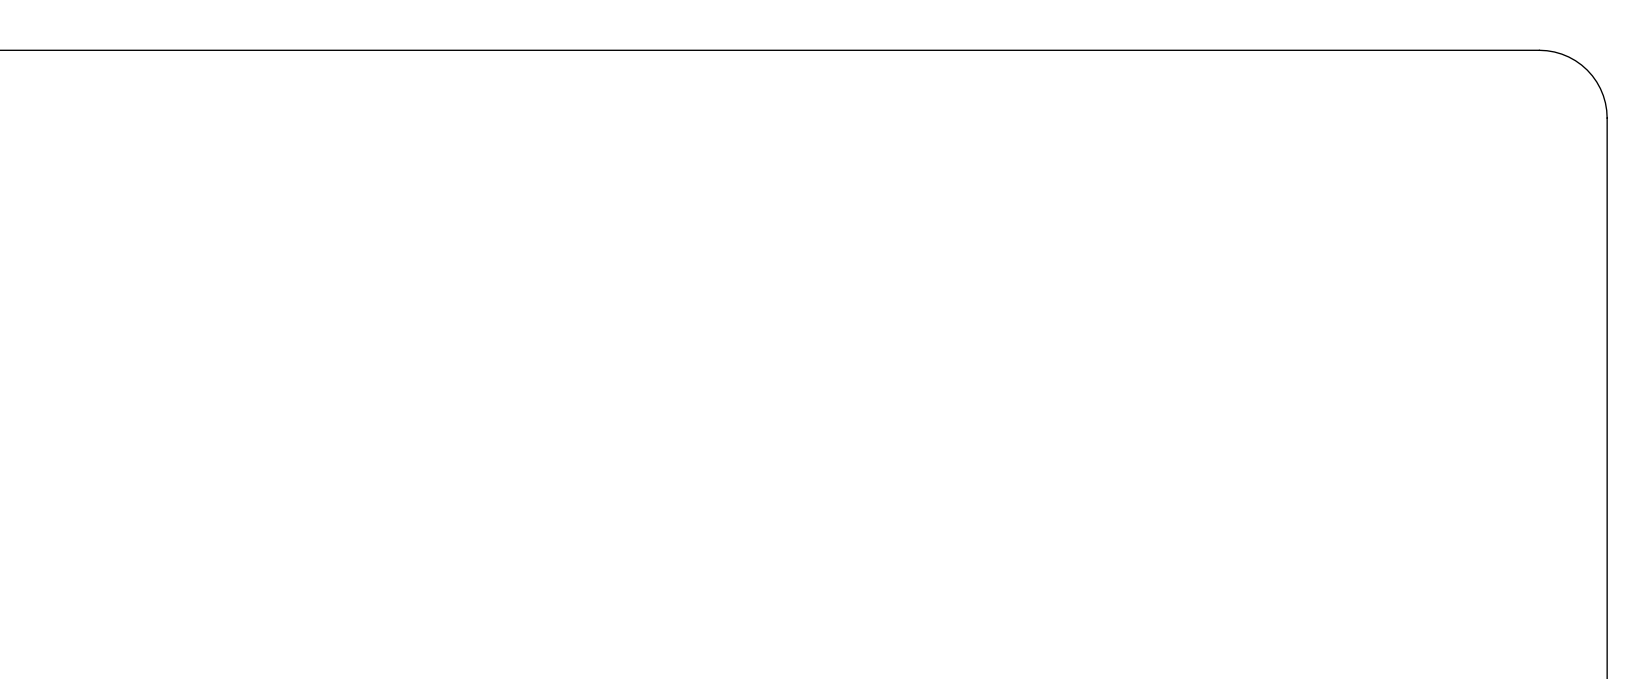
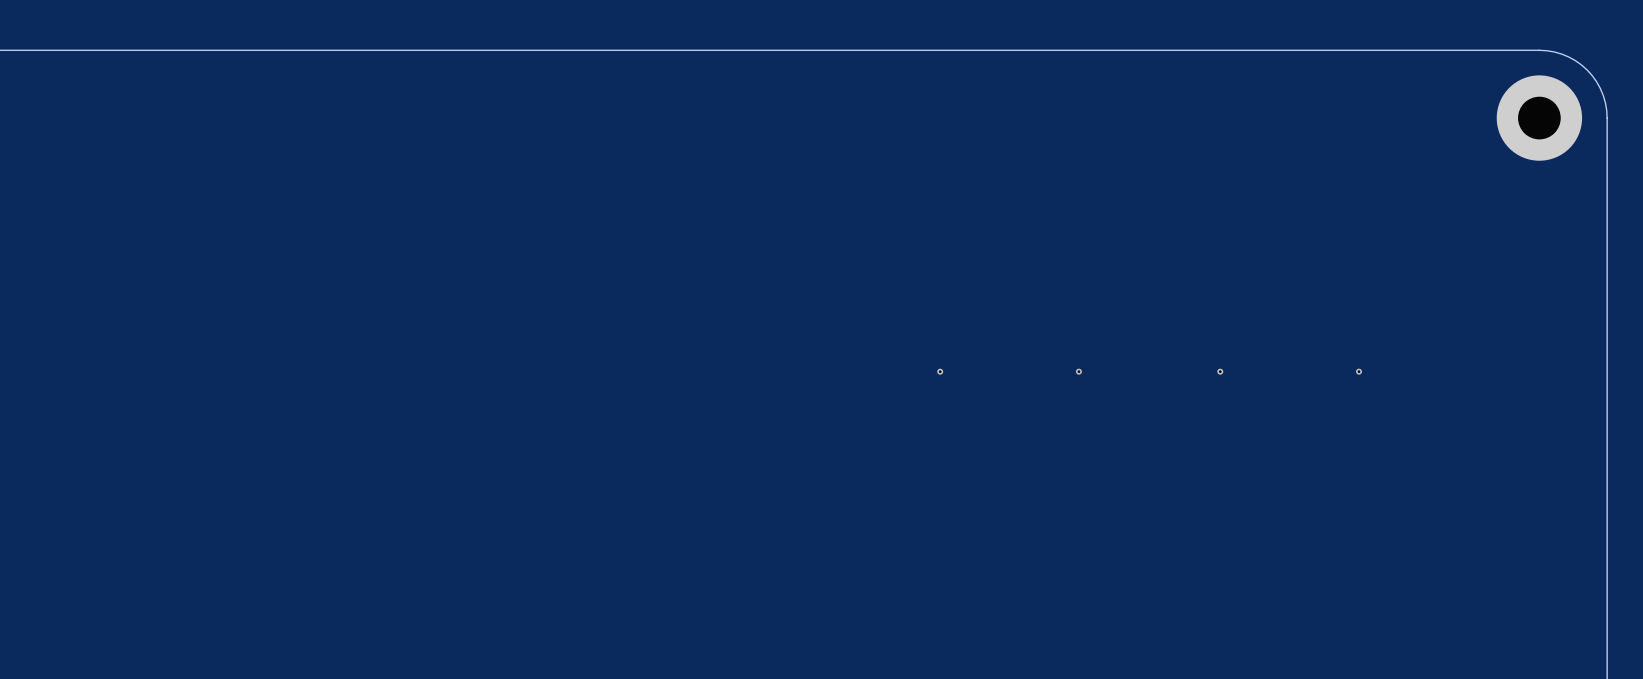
part: none -> (1539, 118)
via: none -> (940, 371)
via: none -> (1078, 371)
via: none -> (1220, 371)
via: none -> (1359, 371)

